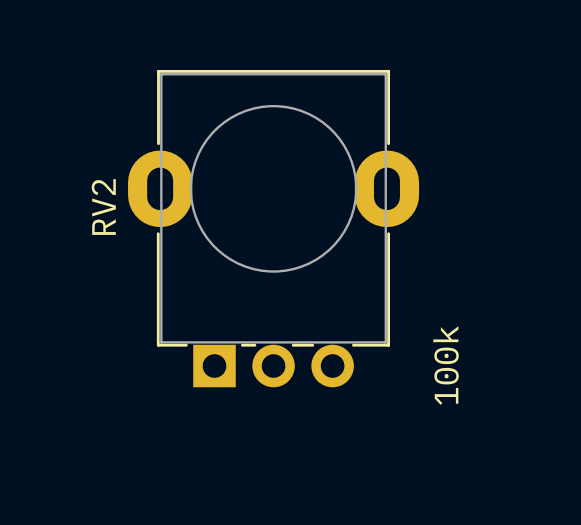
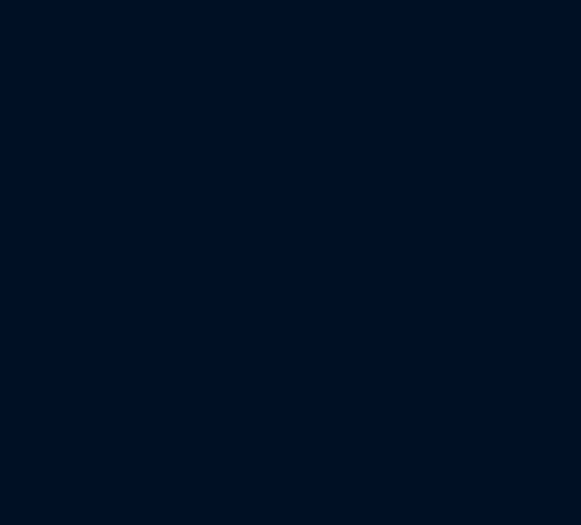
RV2: 100k (273, 228) -> none

